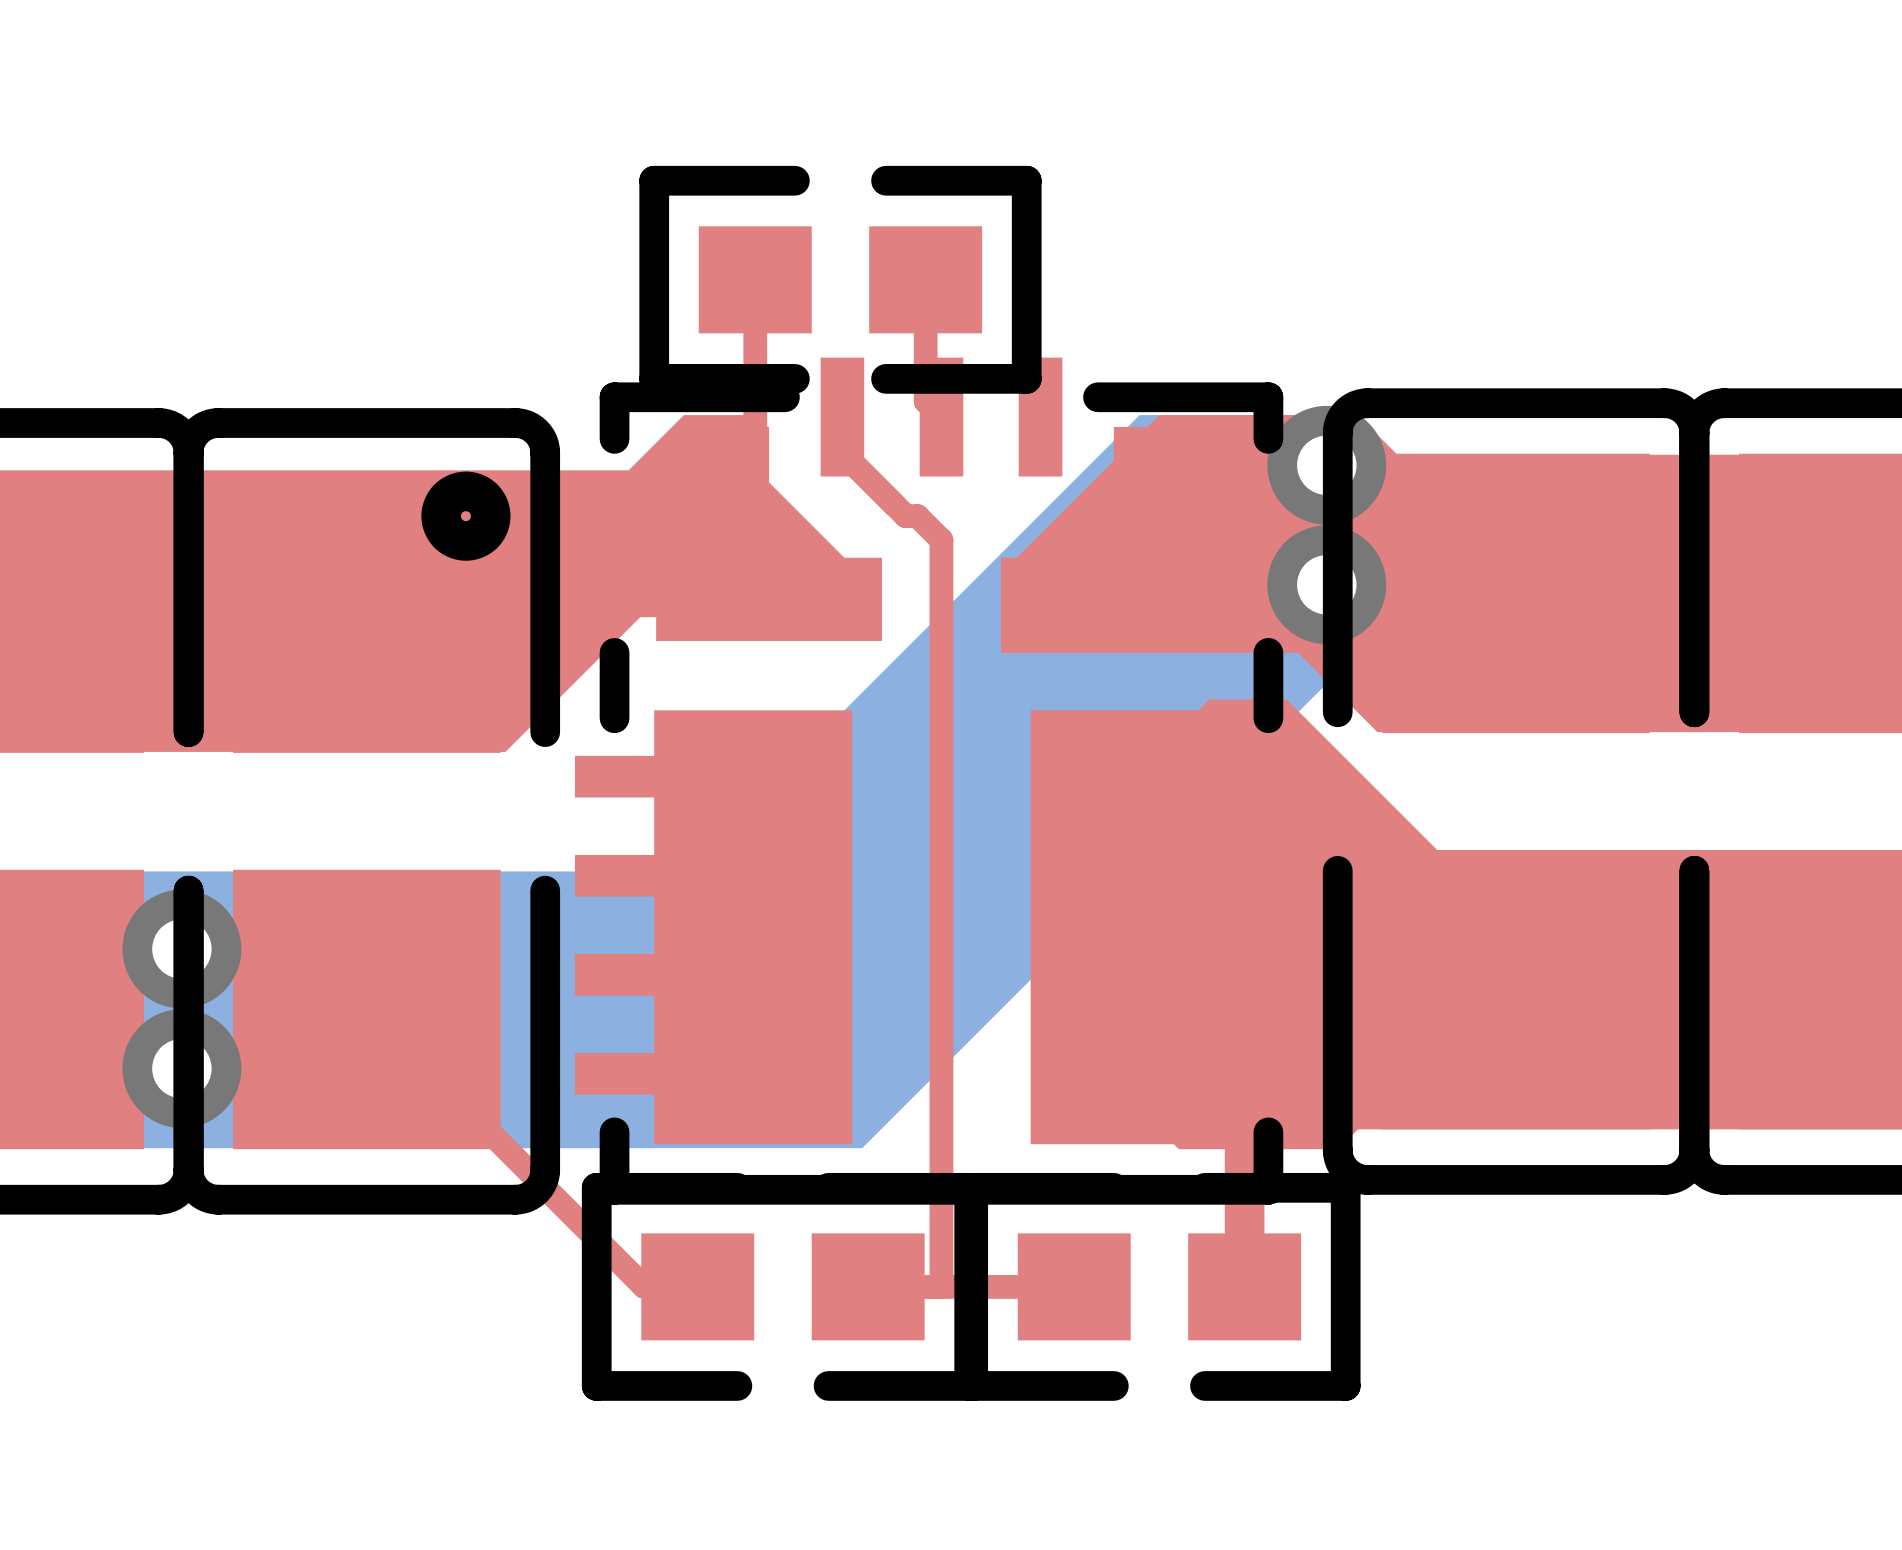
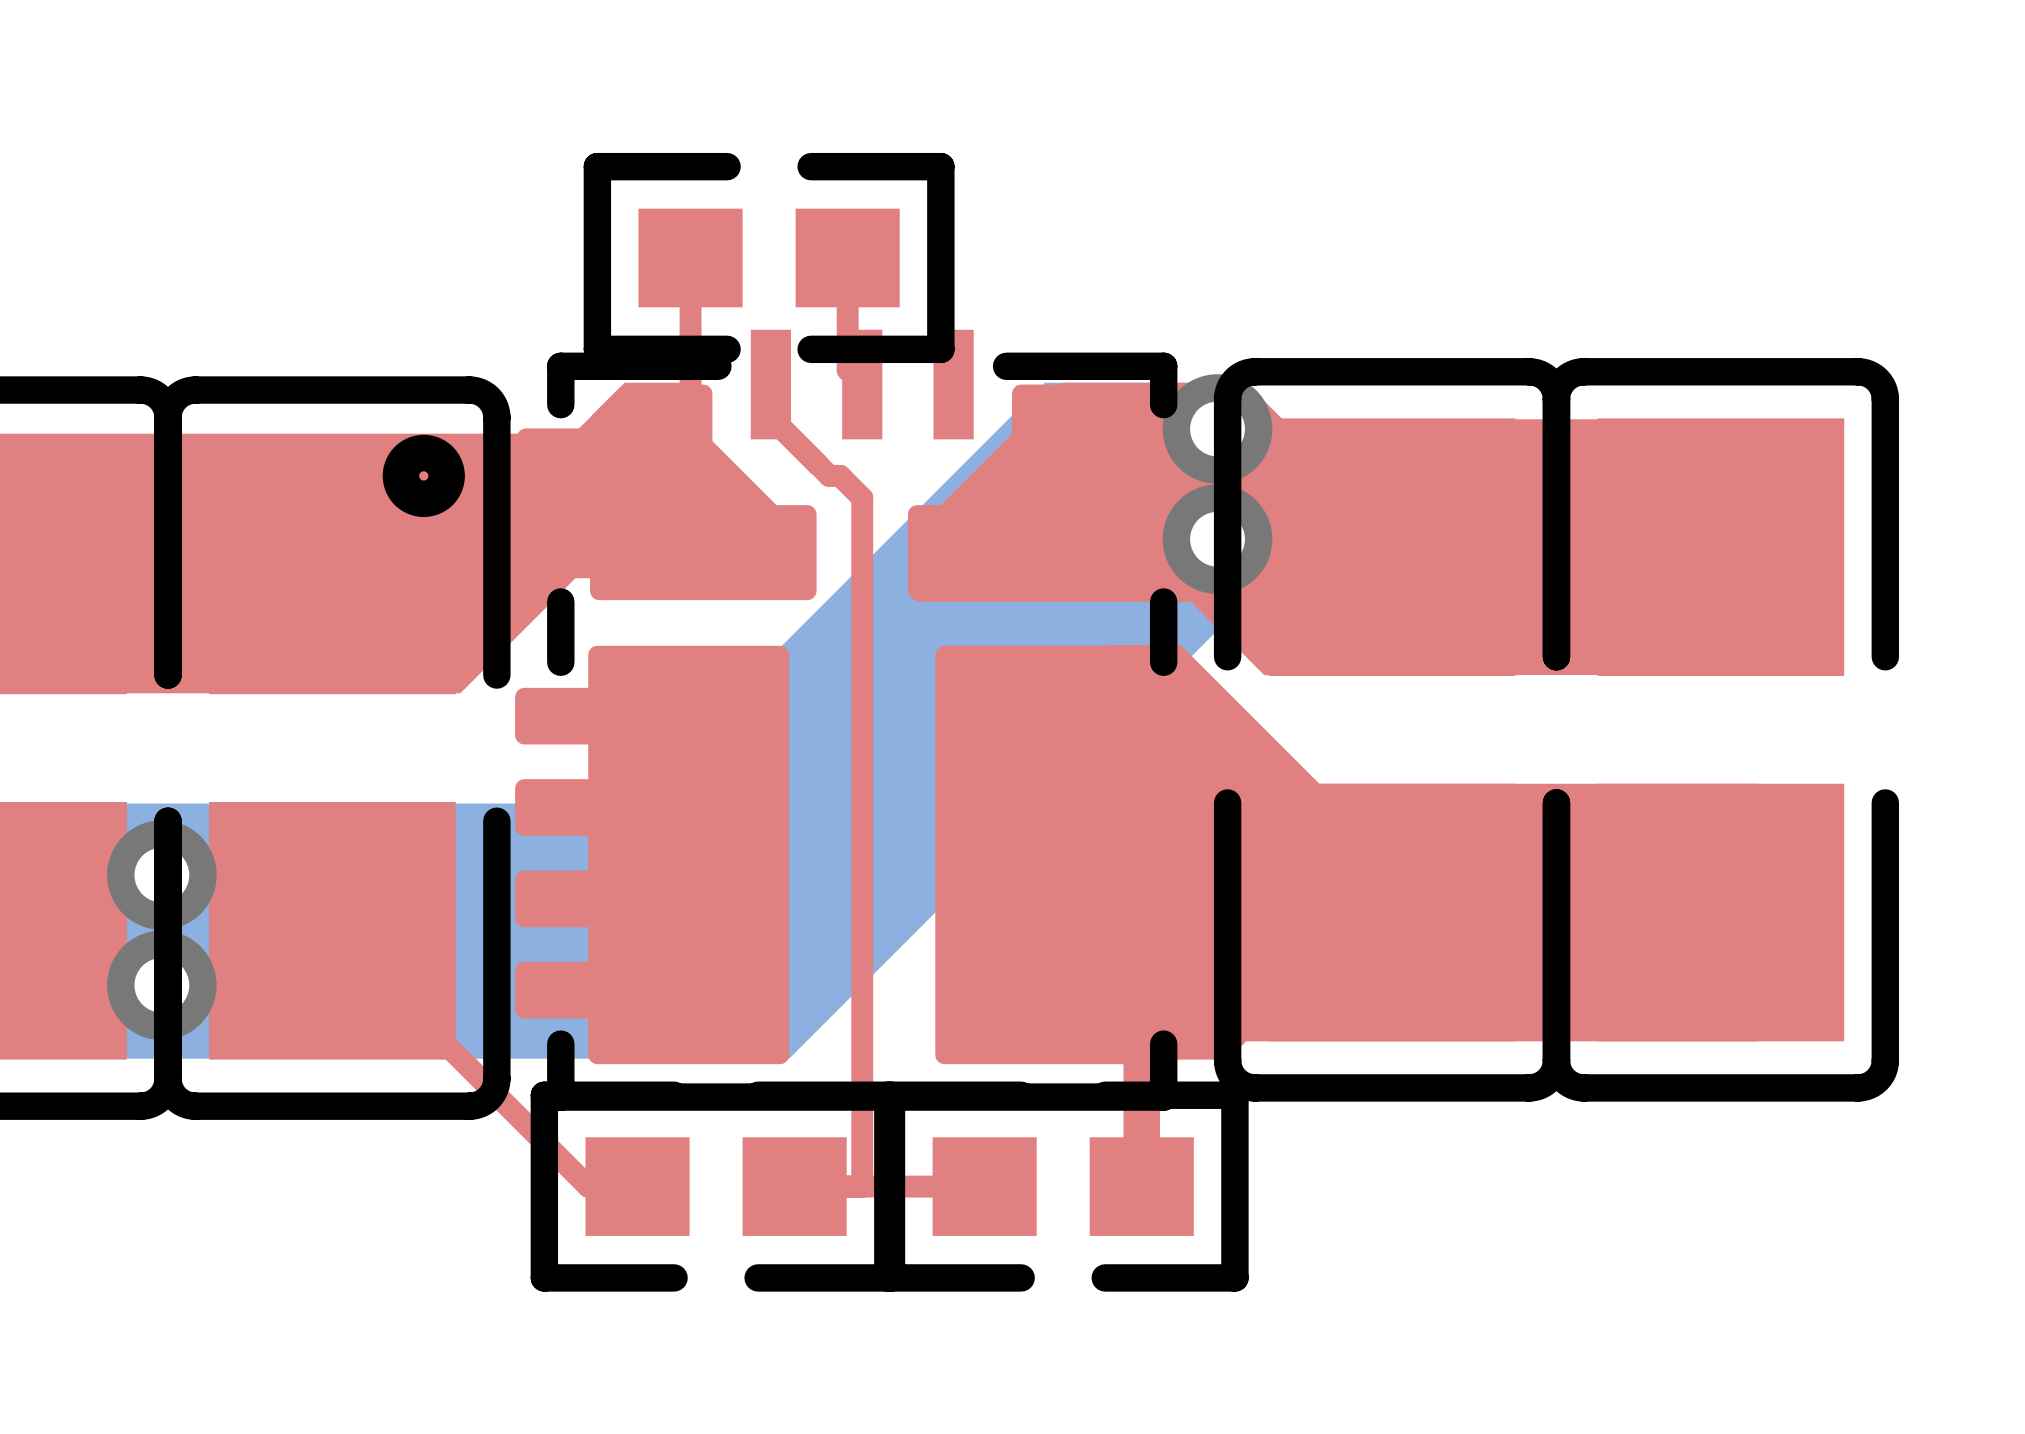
part footprint: [421, 357, 1309, 1205] -> [382, 329, 1210, 1111]

